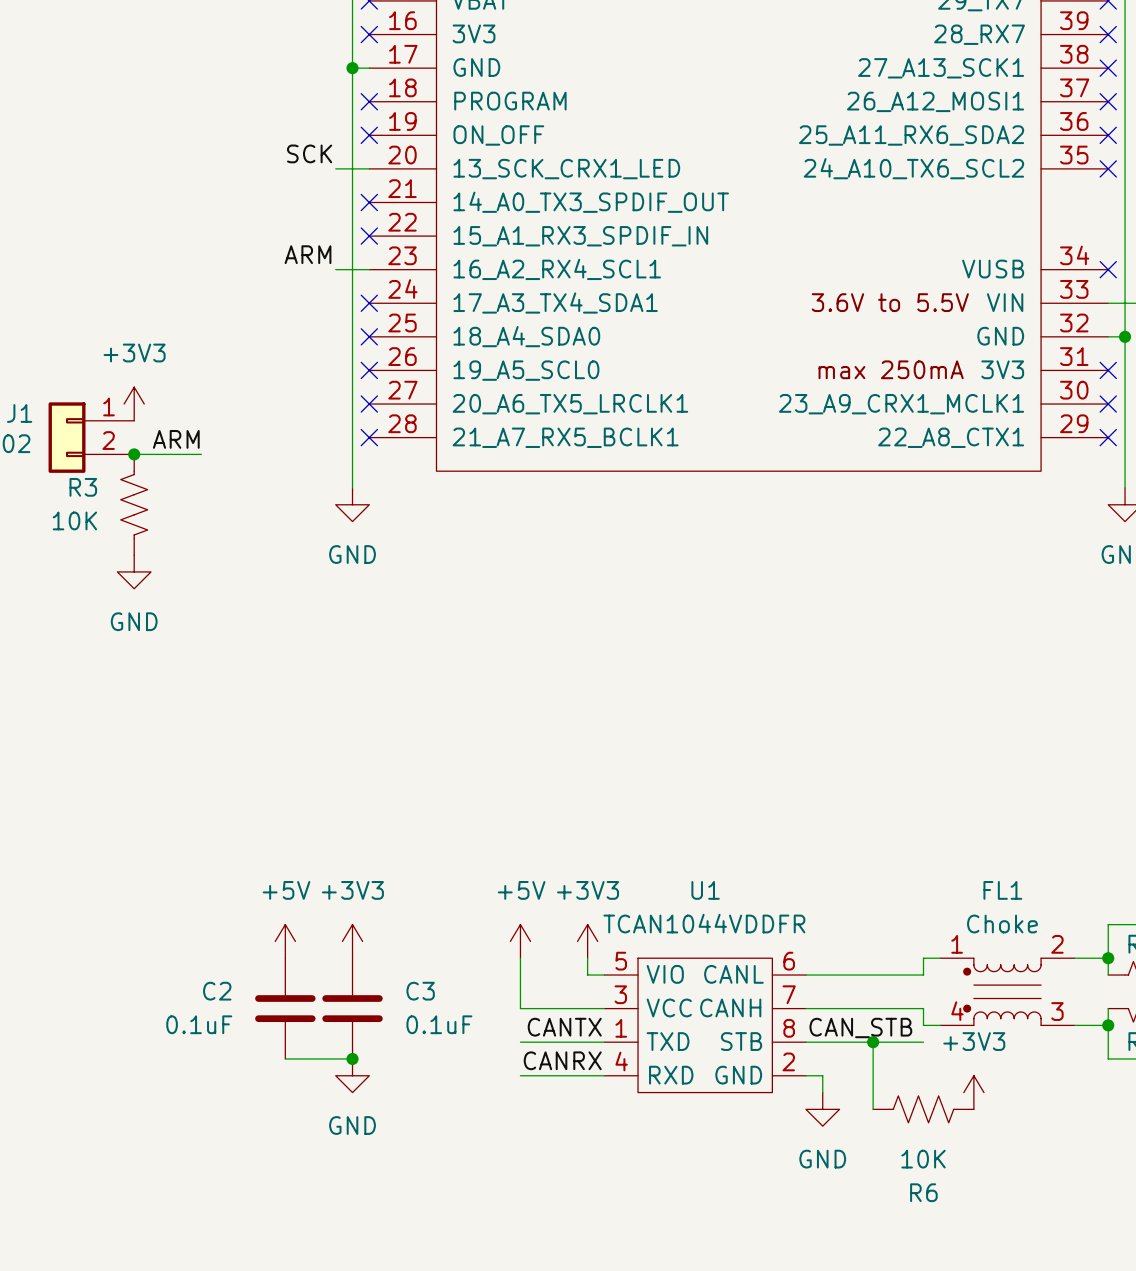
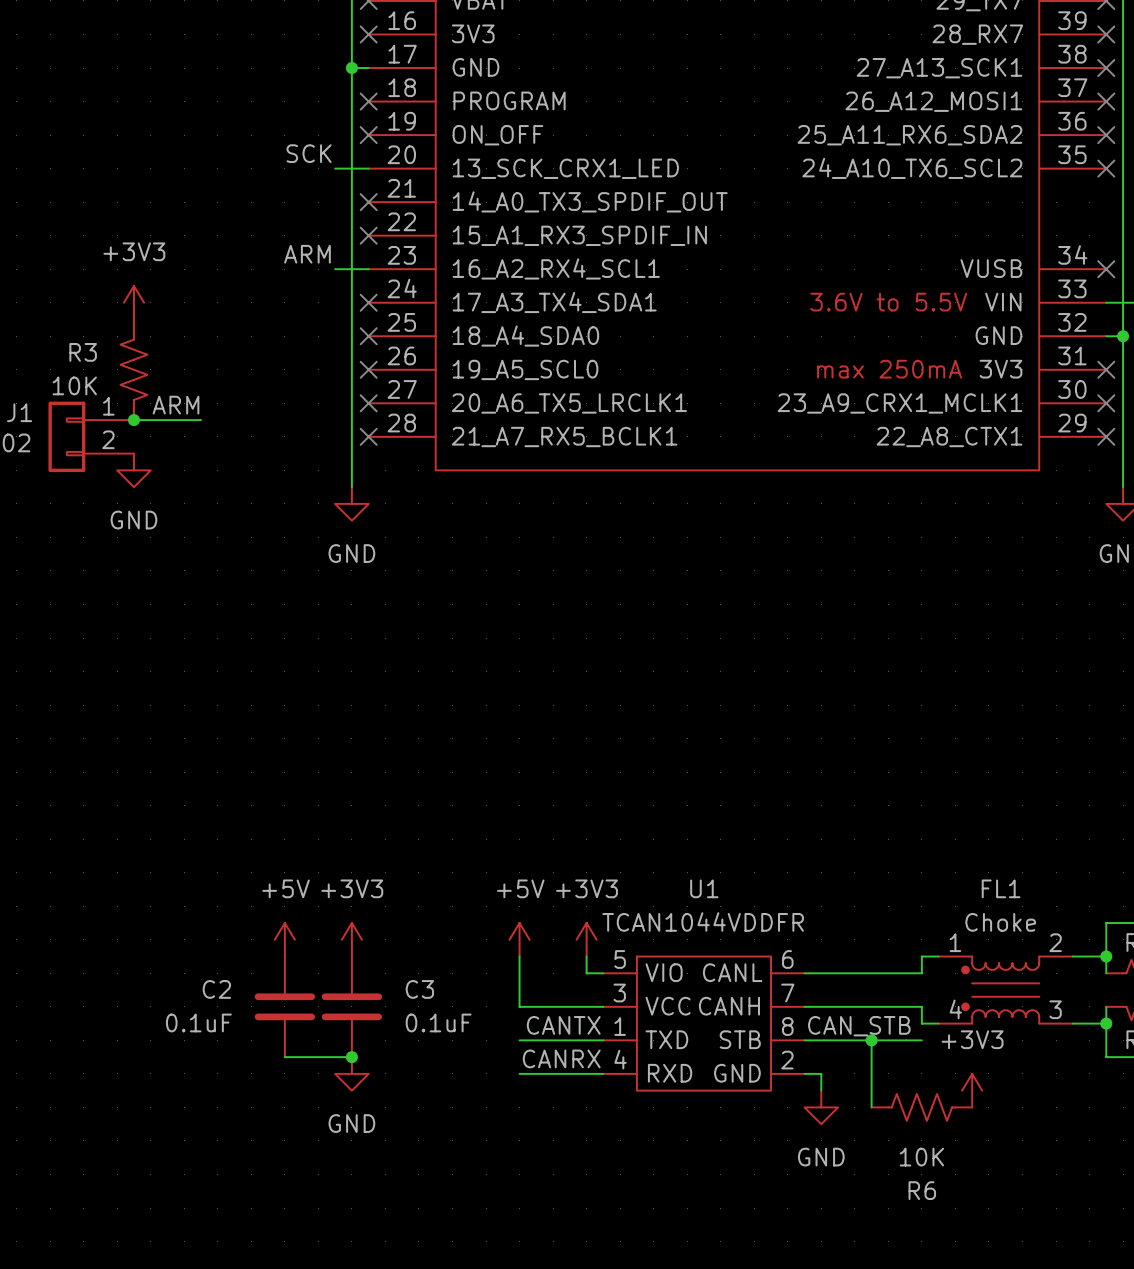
power symbol position: +3V3 (134, 404) -> +3V3 (133, 302)
label position: ARM (176, 439) -> ARM (176, 405)
wire: (134, 454) (201, 454) -> (133, 420) (201, 420)
junction position: (134, 454) -> (133, 420)
R3 position: (134, 504) -> (133, 369)
power symbol position: GND (134, 571) -> GND (133, 470)

